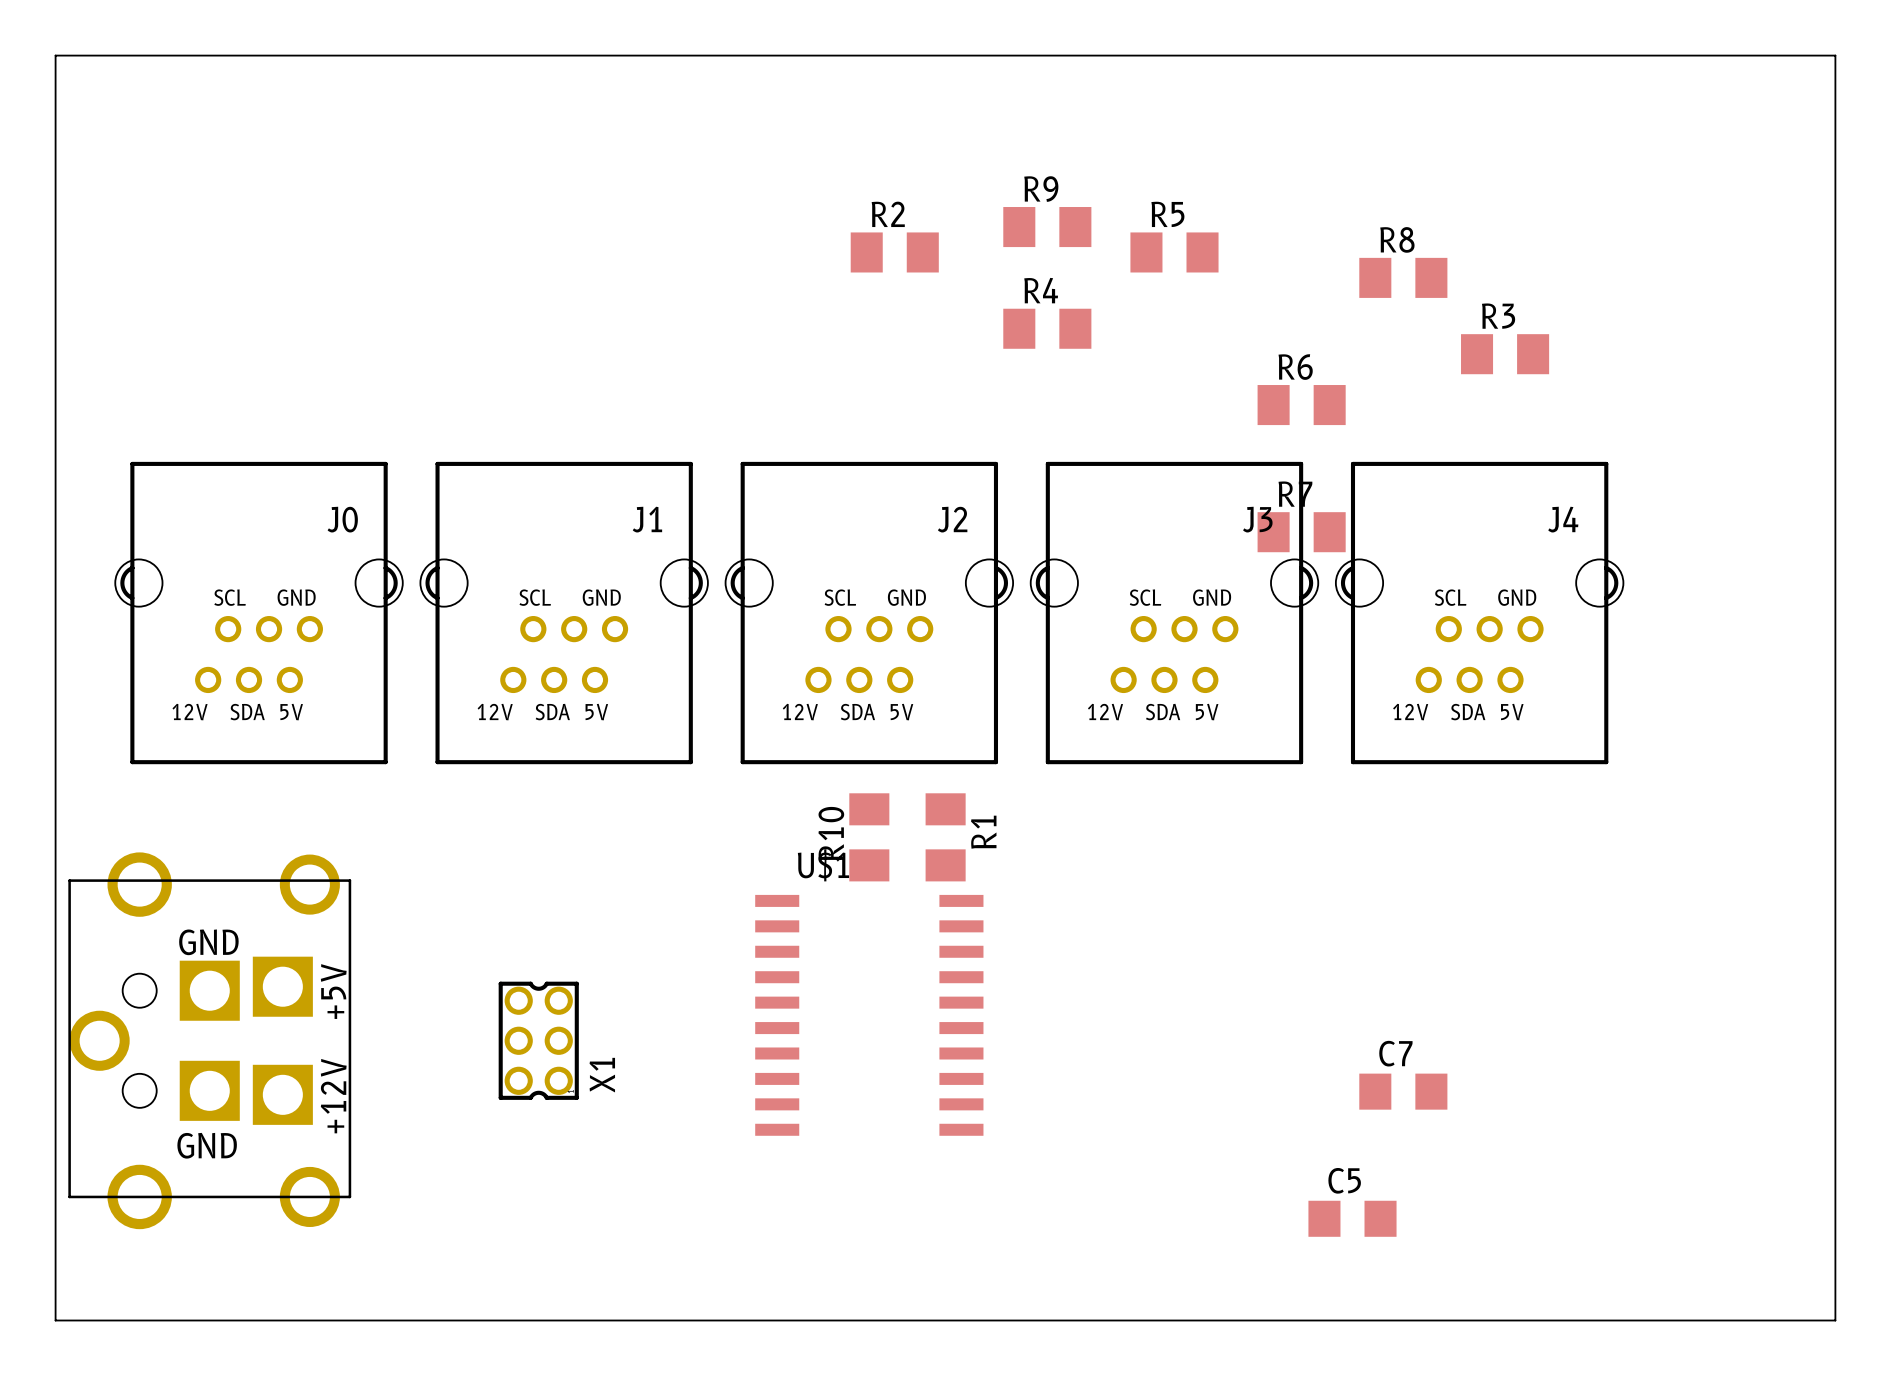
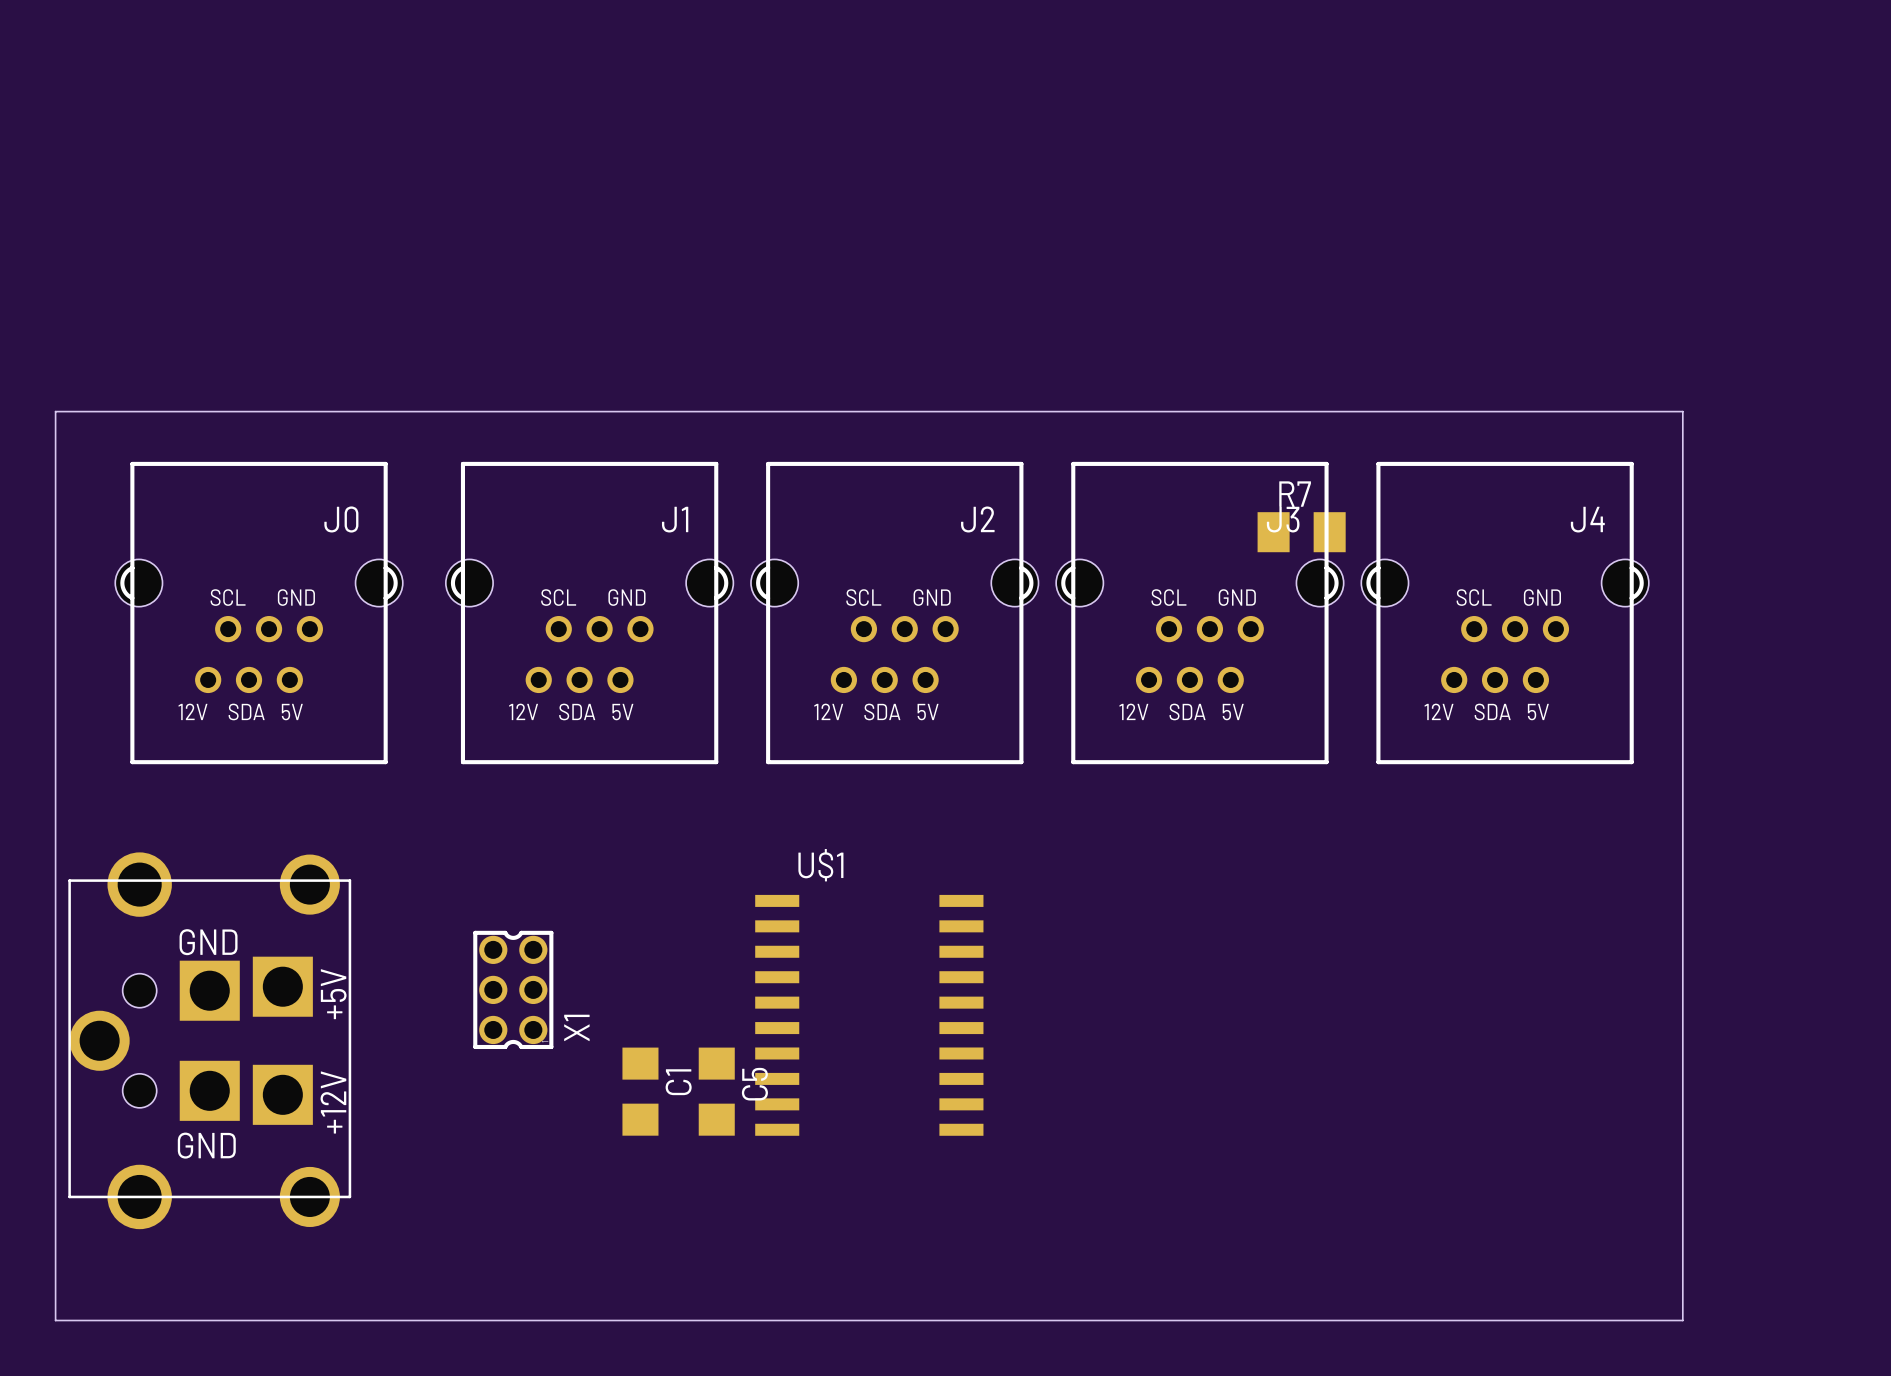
R9: (1047, 227) -> none
R2: (894, 252) -> none
R5: (1174, 252) -> none
R8: (1403, 277) -> none
R4: (1047, 328) -> none
R3: (1505, 354) -> none
R6: (1301, 405) -> none
board edge: (55, 411) (55, 55) (1835, 55) (1835, 1320) (1682, 1320) -> (55, 411) (1682, 411) (1682, 1320)
J1 position: (564, 613) -> (589, 613)
J2 position: (869, 613) -> (894, 613)
J3 position: (1174, 613) -> (1199, 613)
J4 position: (1479, 613) -> (1505, 613)
R10: (869, 837) -> none
R1: (945, 837) -> none
X1 position: (538, 1040) -> (513, 989)
C1: none -> (640, 1091)
C7: (1403, 1091) -> none
C5 rotation: 0° (1352, 1218) -> 90° clockwise (716, 1091)
C5 position: (1352, 1218) -> (716, 1091)

